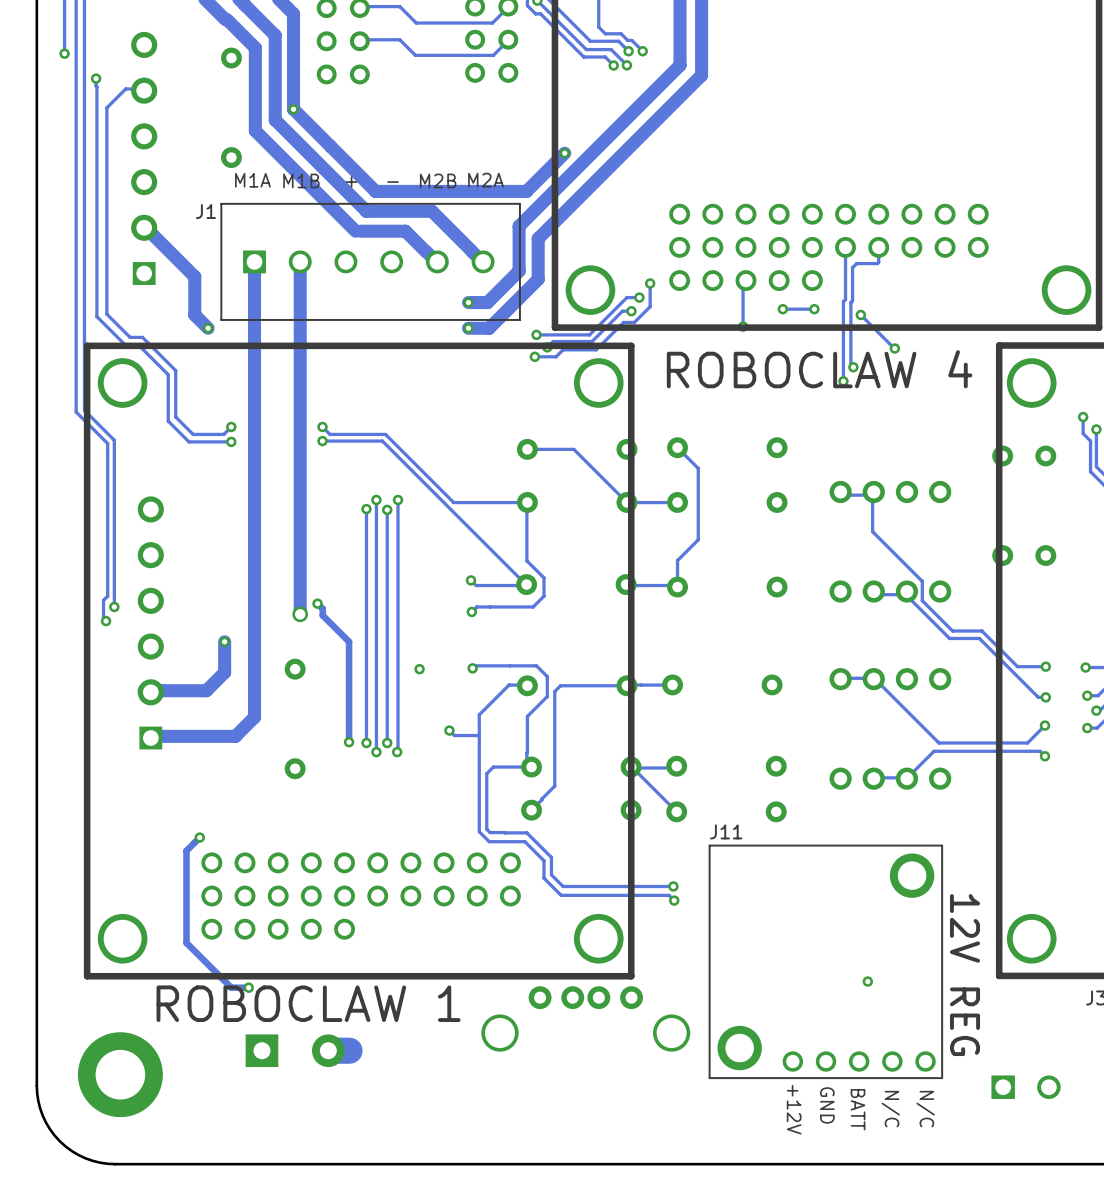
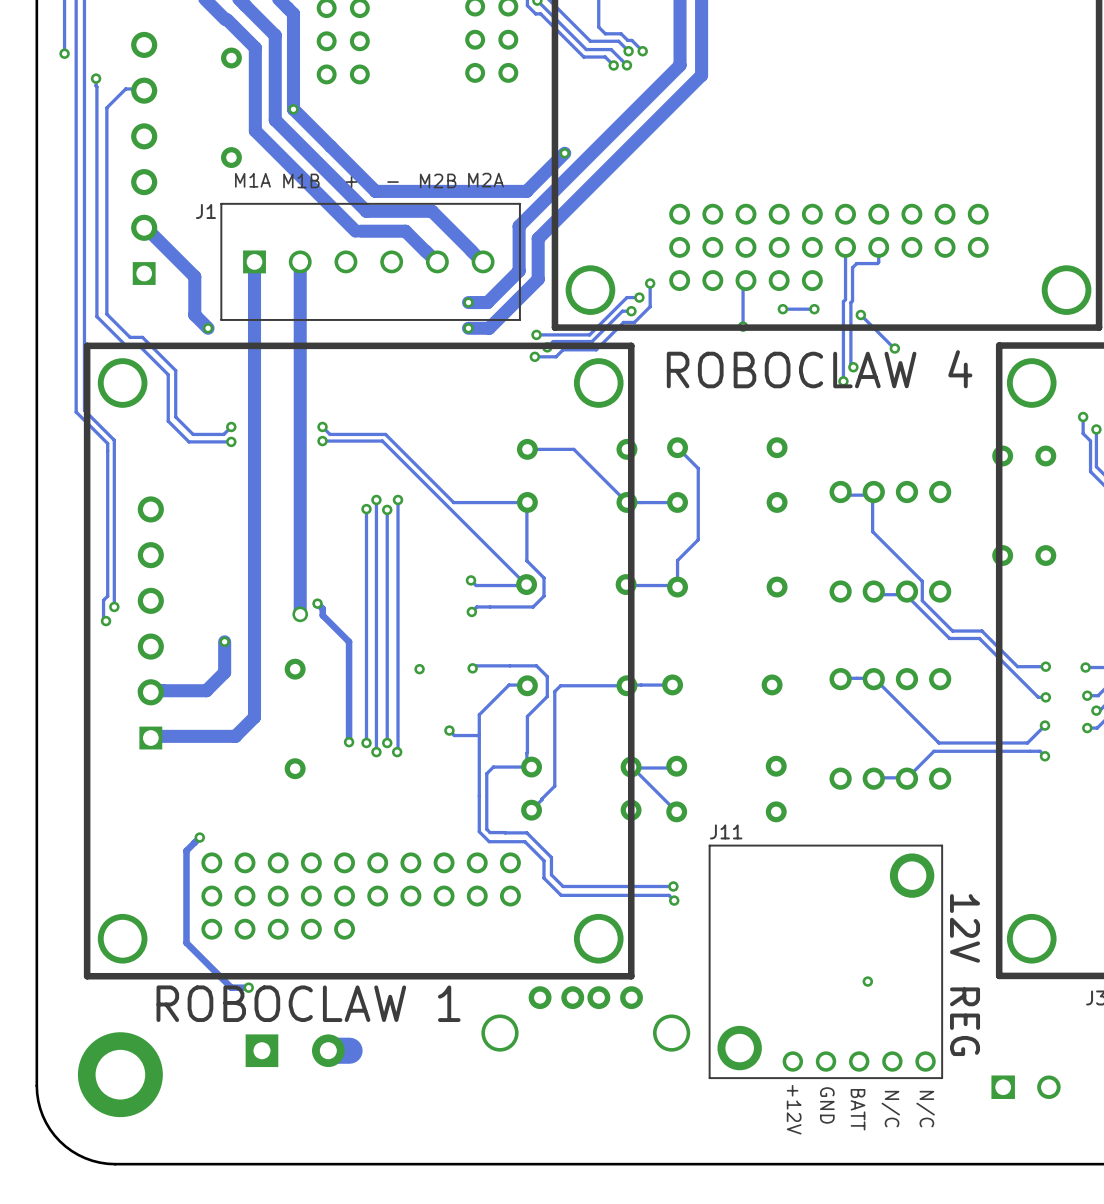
track: (399, 6) (362, 6) -> none
track: (509, 6) (492, 23) (416, 23) (399, 6) -> none
track: (399, 39) (362, 39) -> none
track: (509, 39) (493, 55) (415, 55) (399, 39) -> none

